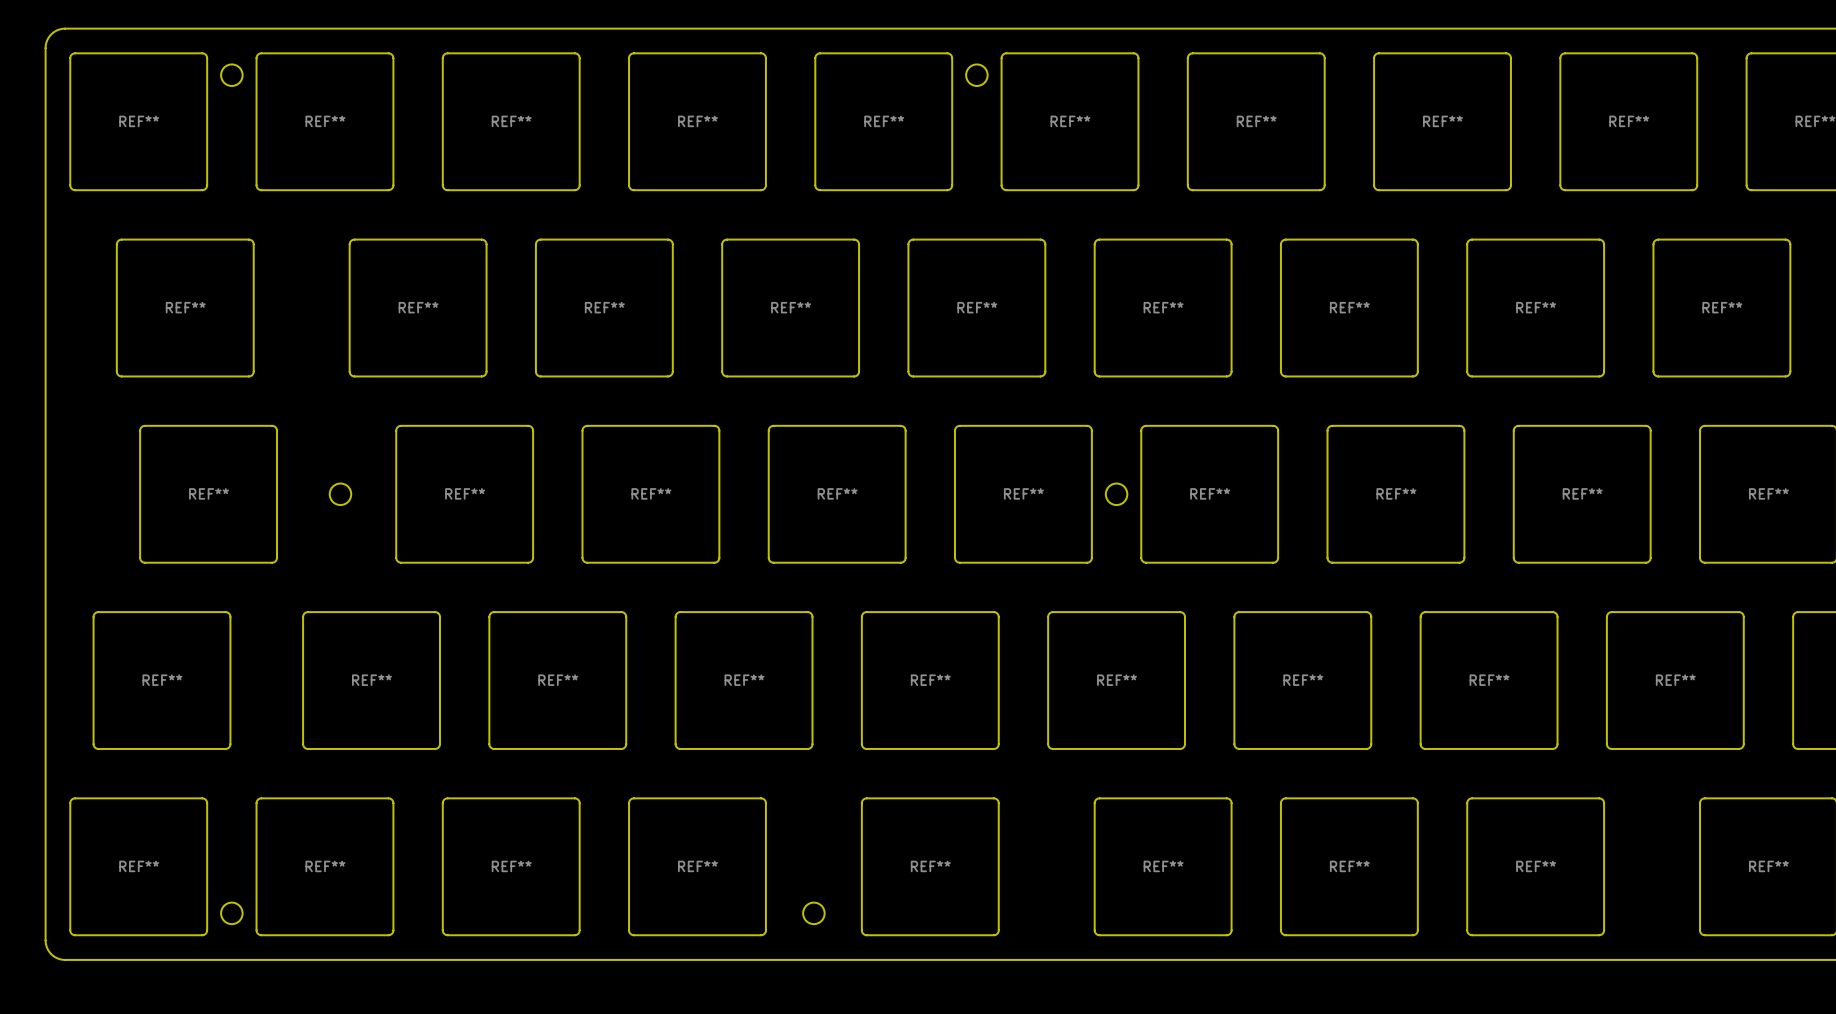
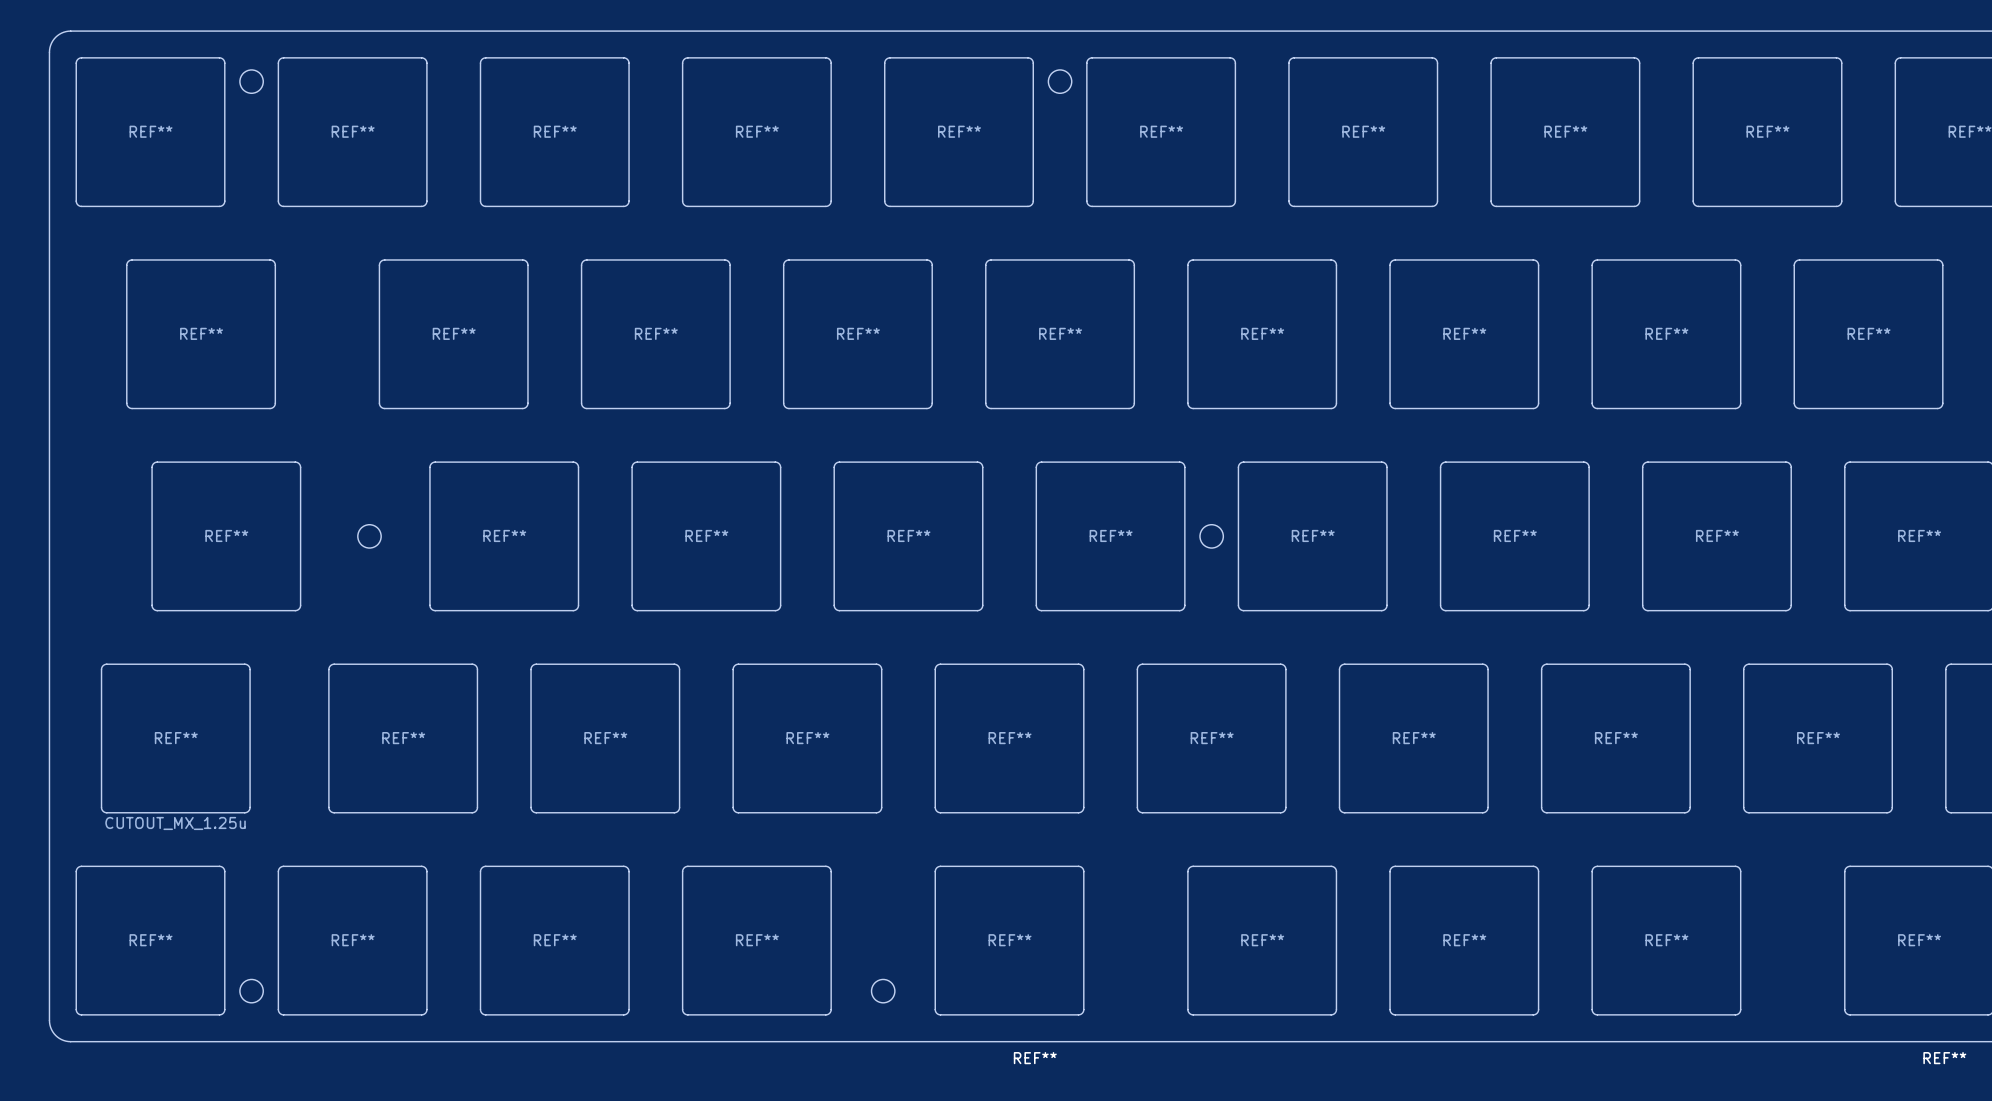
REF** value: none -> CUTOUT_MX_1.25u (175, 823)
text: none -> REF** (1035, 1058)
text: none -> REF** (1944, 1058)

